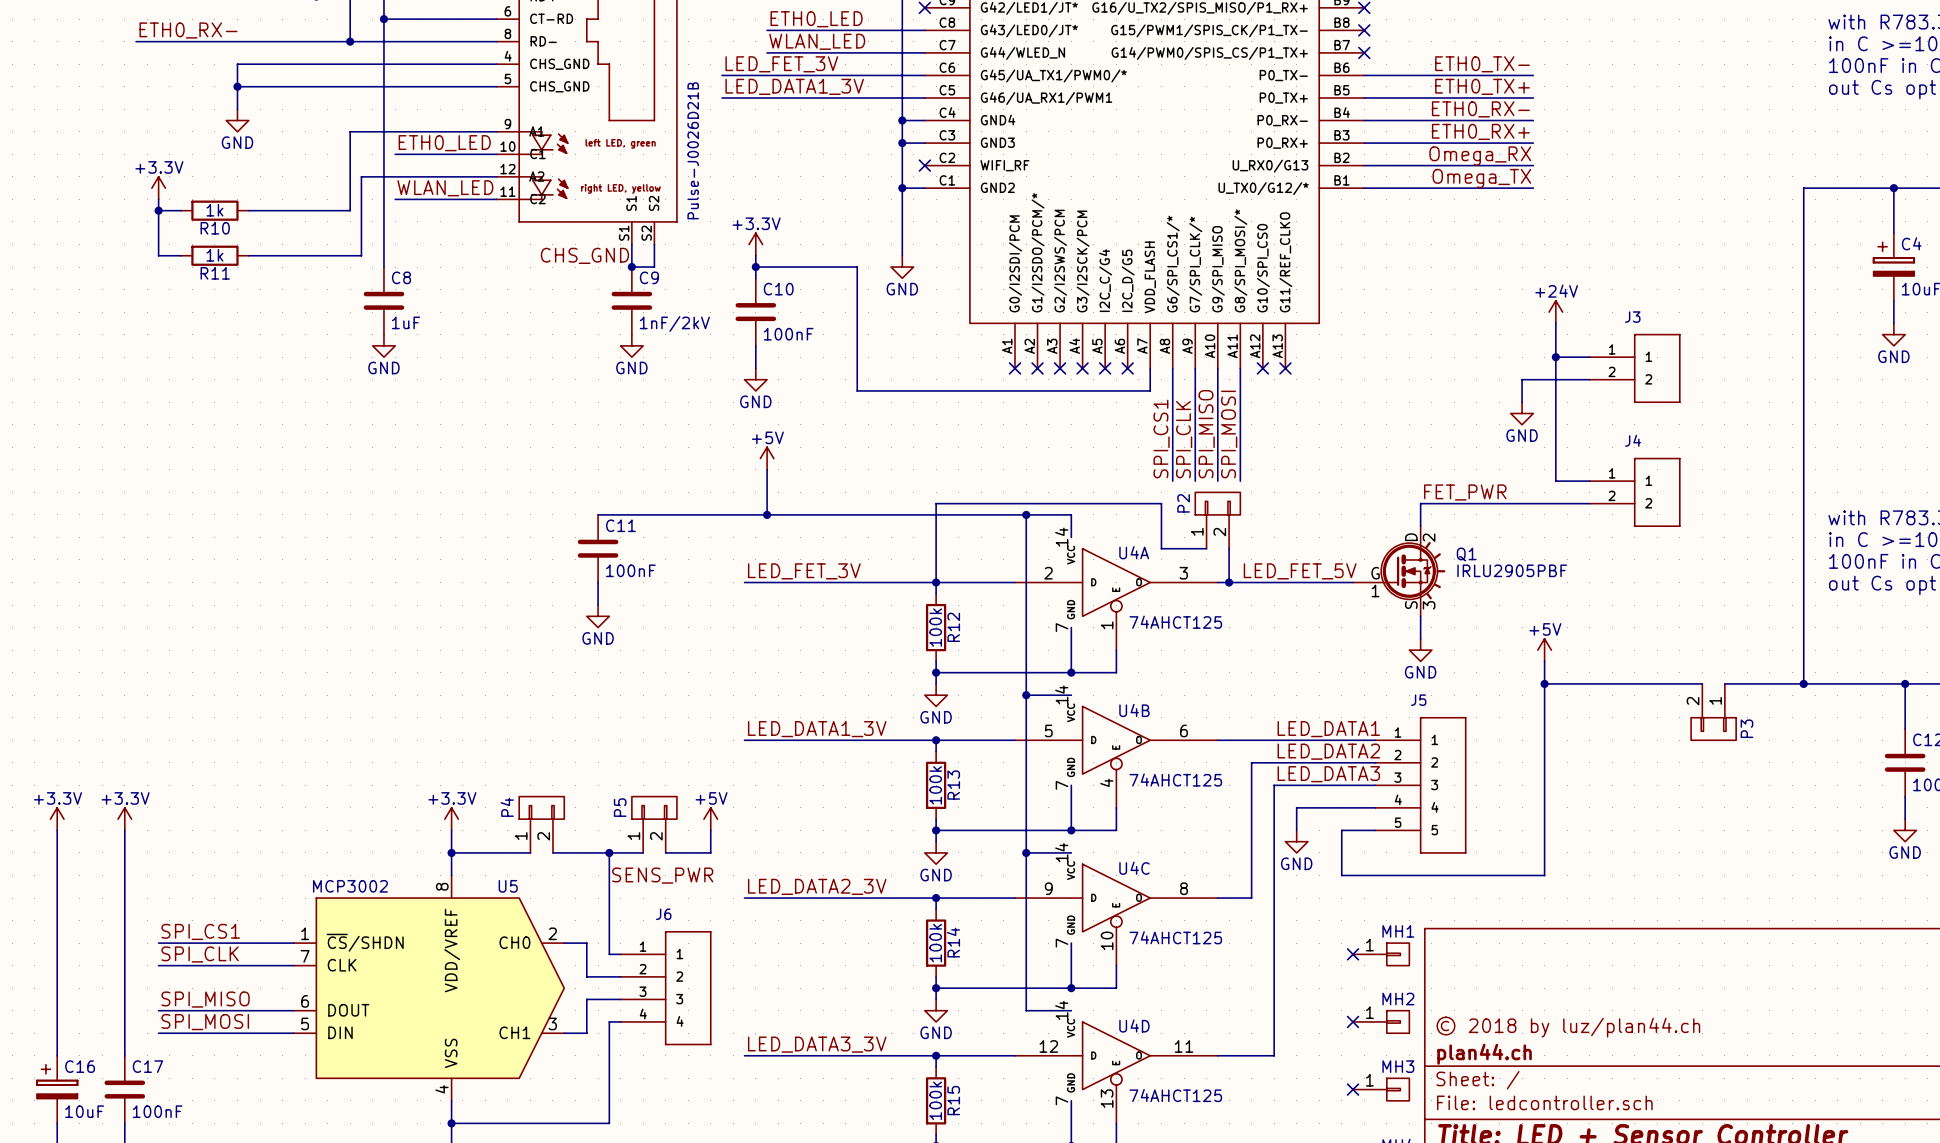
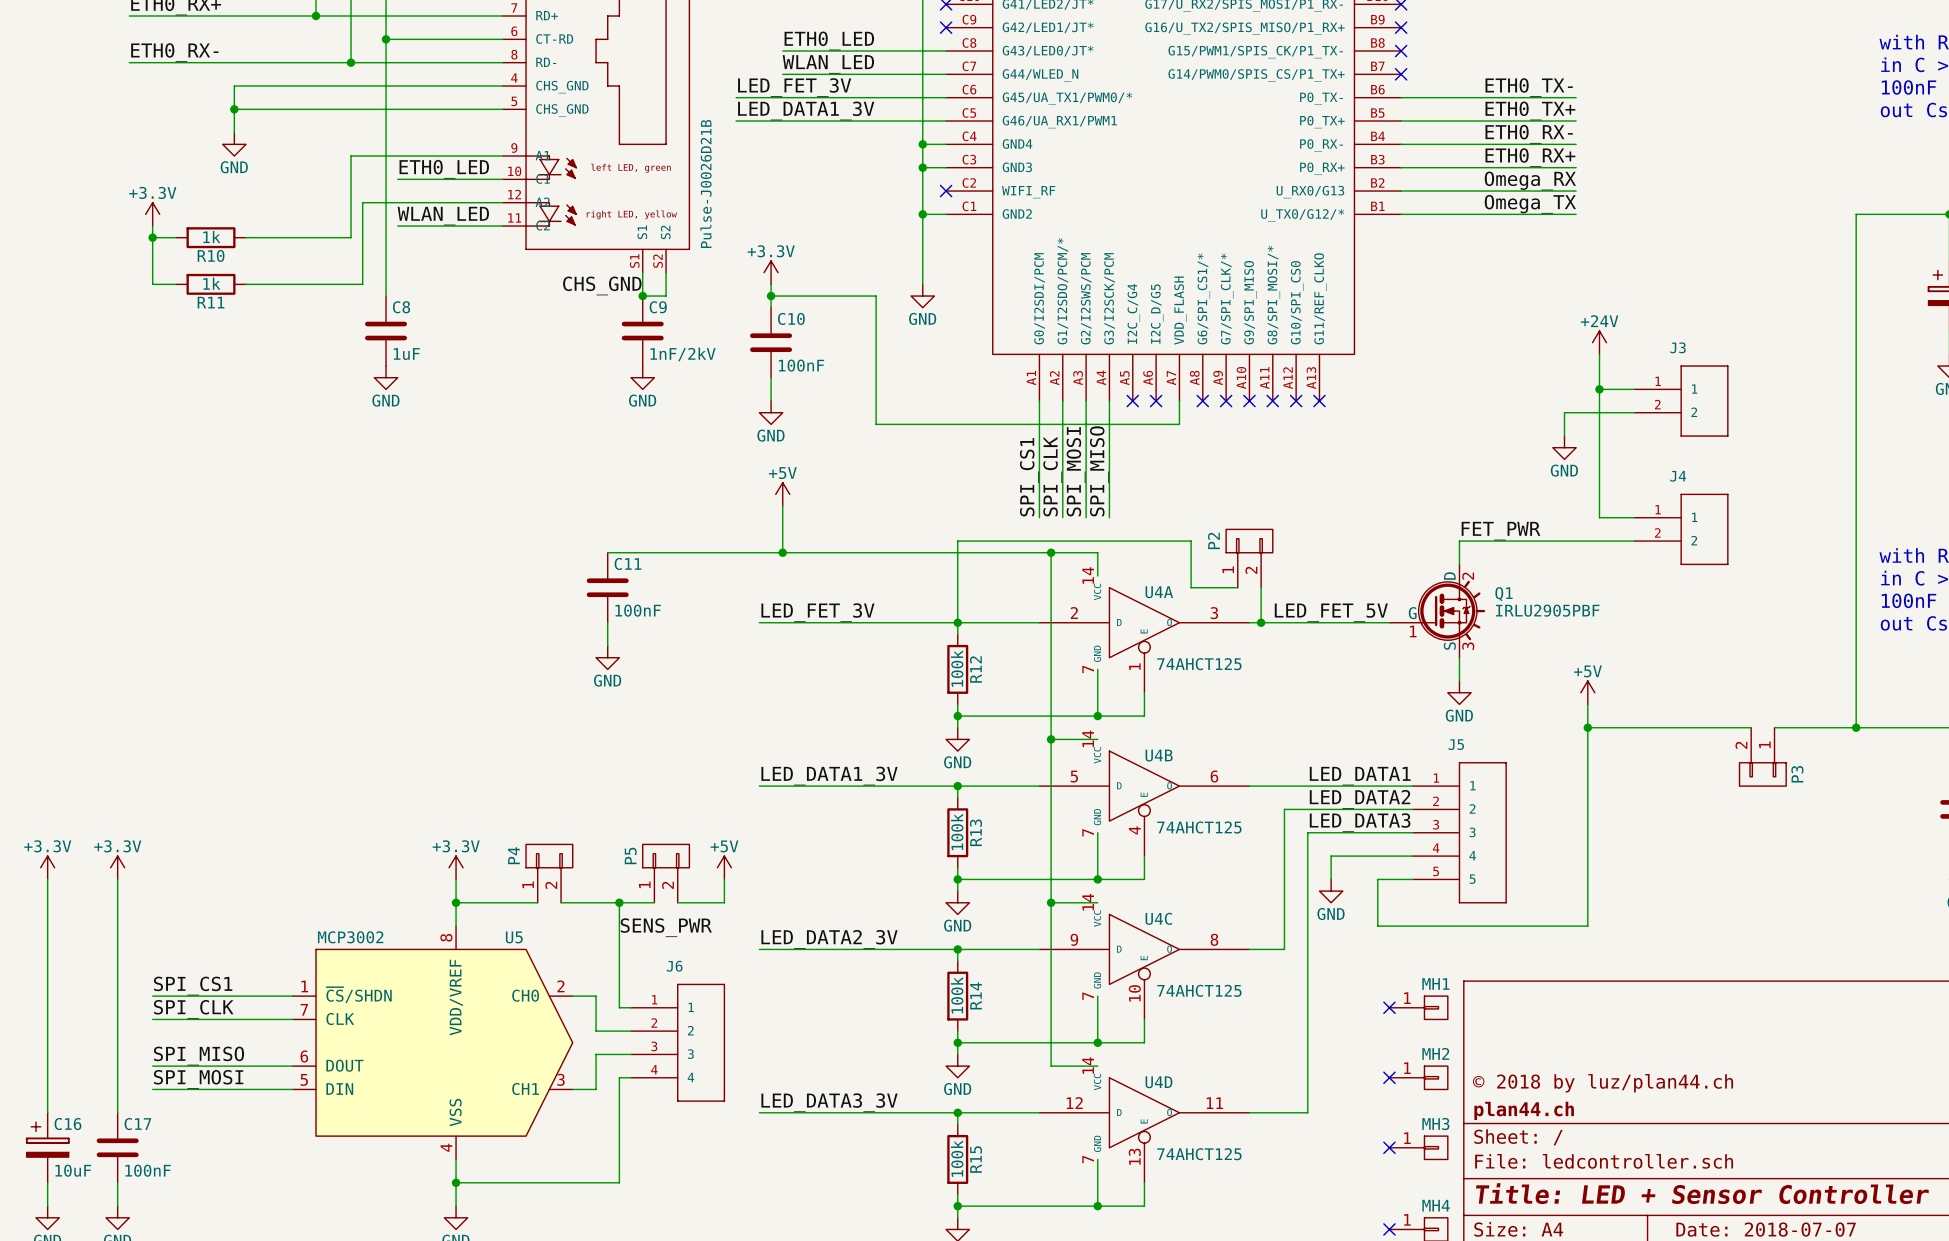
no-connect mark: (1014, 368) -> none
no-connect mark: (1037, 368) -> none
no-connect mark: (1060, 368) -> none
no-connect mark: (1082, 368) -> none
wire: (1172, 368) (1172, 481) -> (1039, 401) (1039, 517)
no-connect mark: none -> (1202, 401)
wire: (1195, 368) (1195, 481) -> (1062, 401) (1062, 517)
no-connect mark: none -> (1226, 401)
wire: (1217, 368) (1217, 481) -> (1086, 401) (1086, 517)
no-connect mark: none -> (1249, 401)
wire: (1240, 368) (1240, 481) -> (1109, 401) (1109, 517)
no-connect mark: none -> (1272, 401)
label position: SPI_MISO (1206, 434) -> SPI_MISO (1099, 471)
label position: SPI_MOSI (1229, 434) -> SPI_MOSI (1076, 471)
label position: SPI_CS1 (1161, 439) -> SPI_CS1 (1029, 477)
label position: SPI_CLK (1184, 439) -> SPI_CLK (1052, 476)

